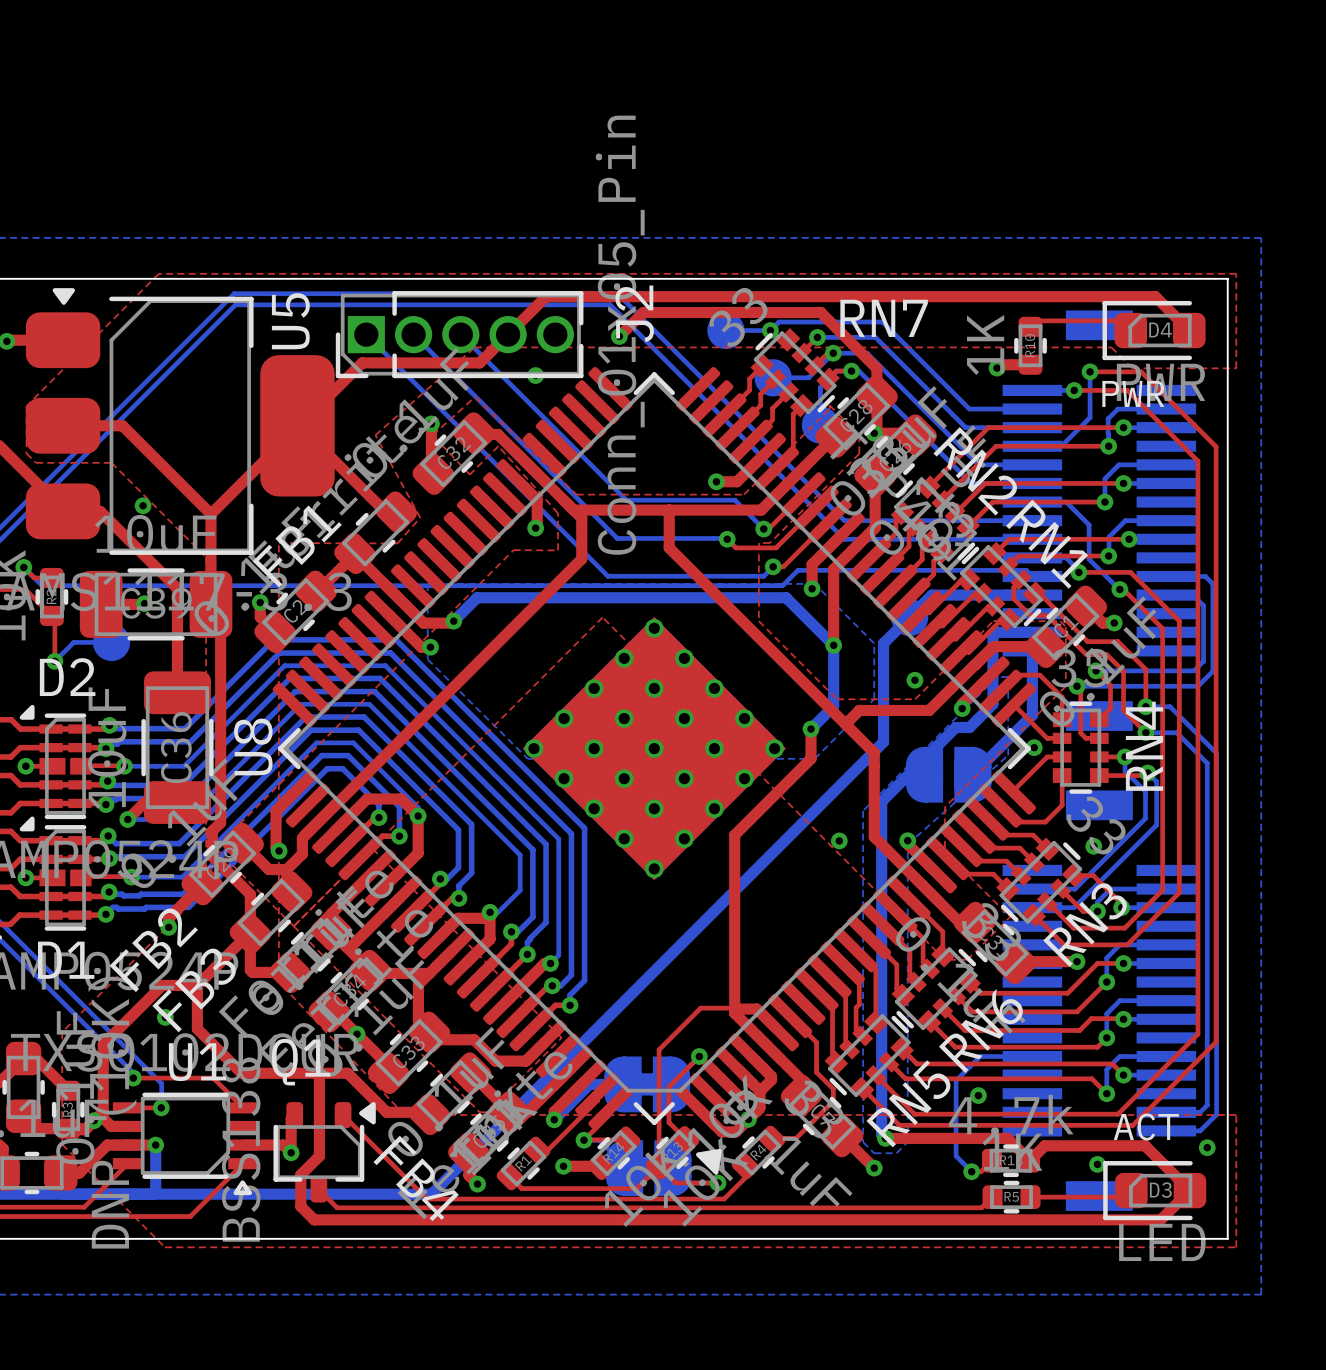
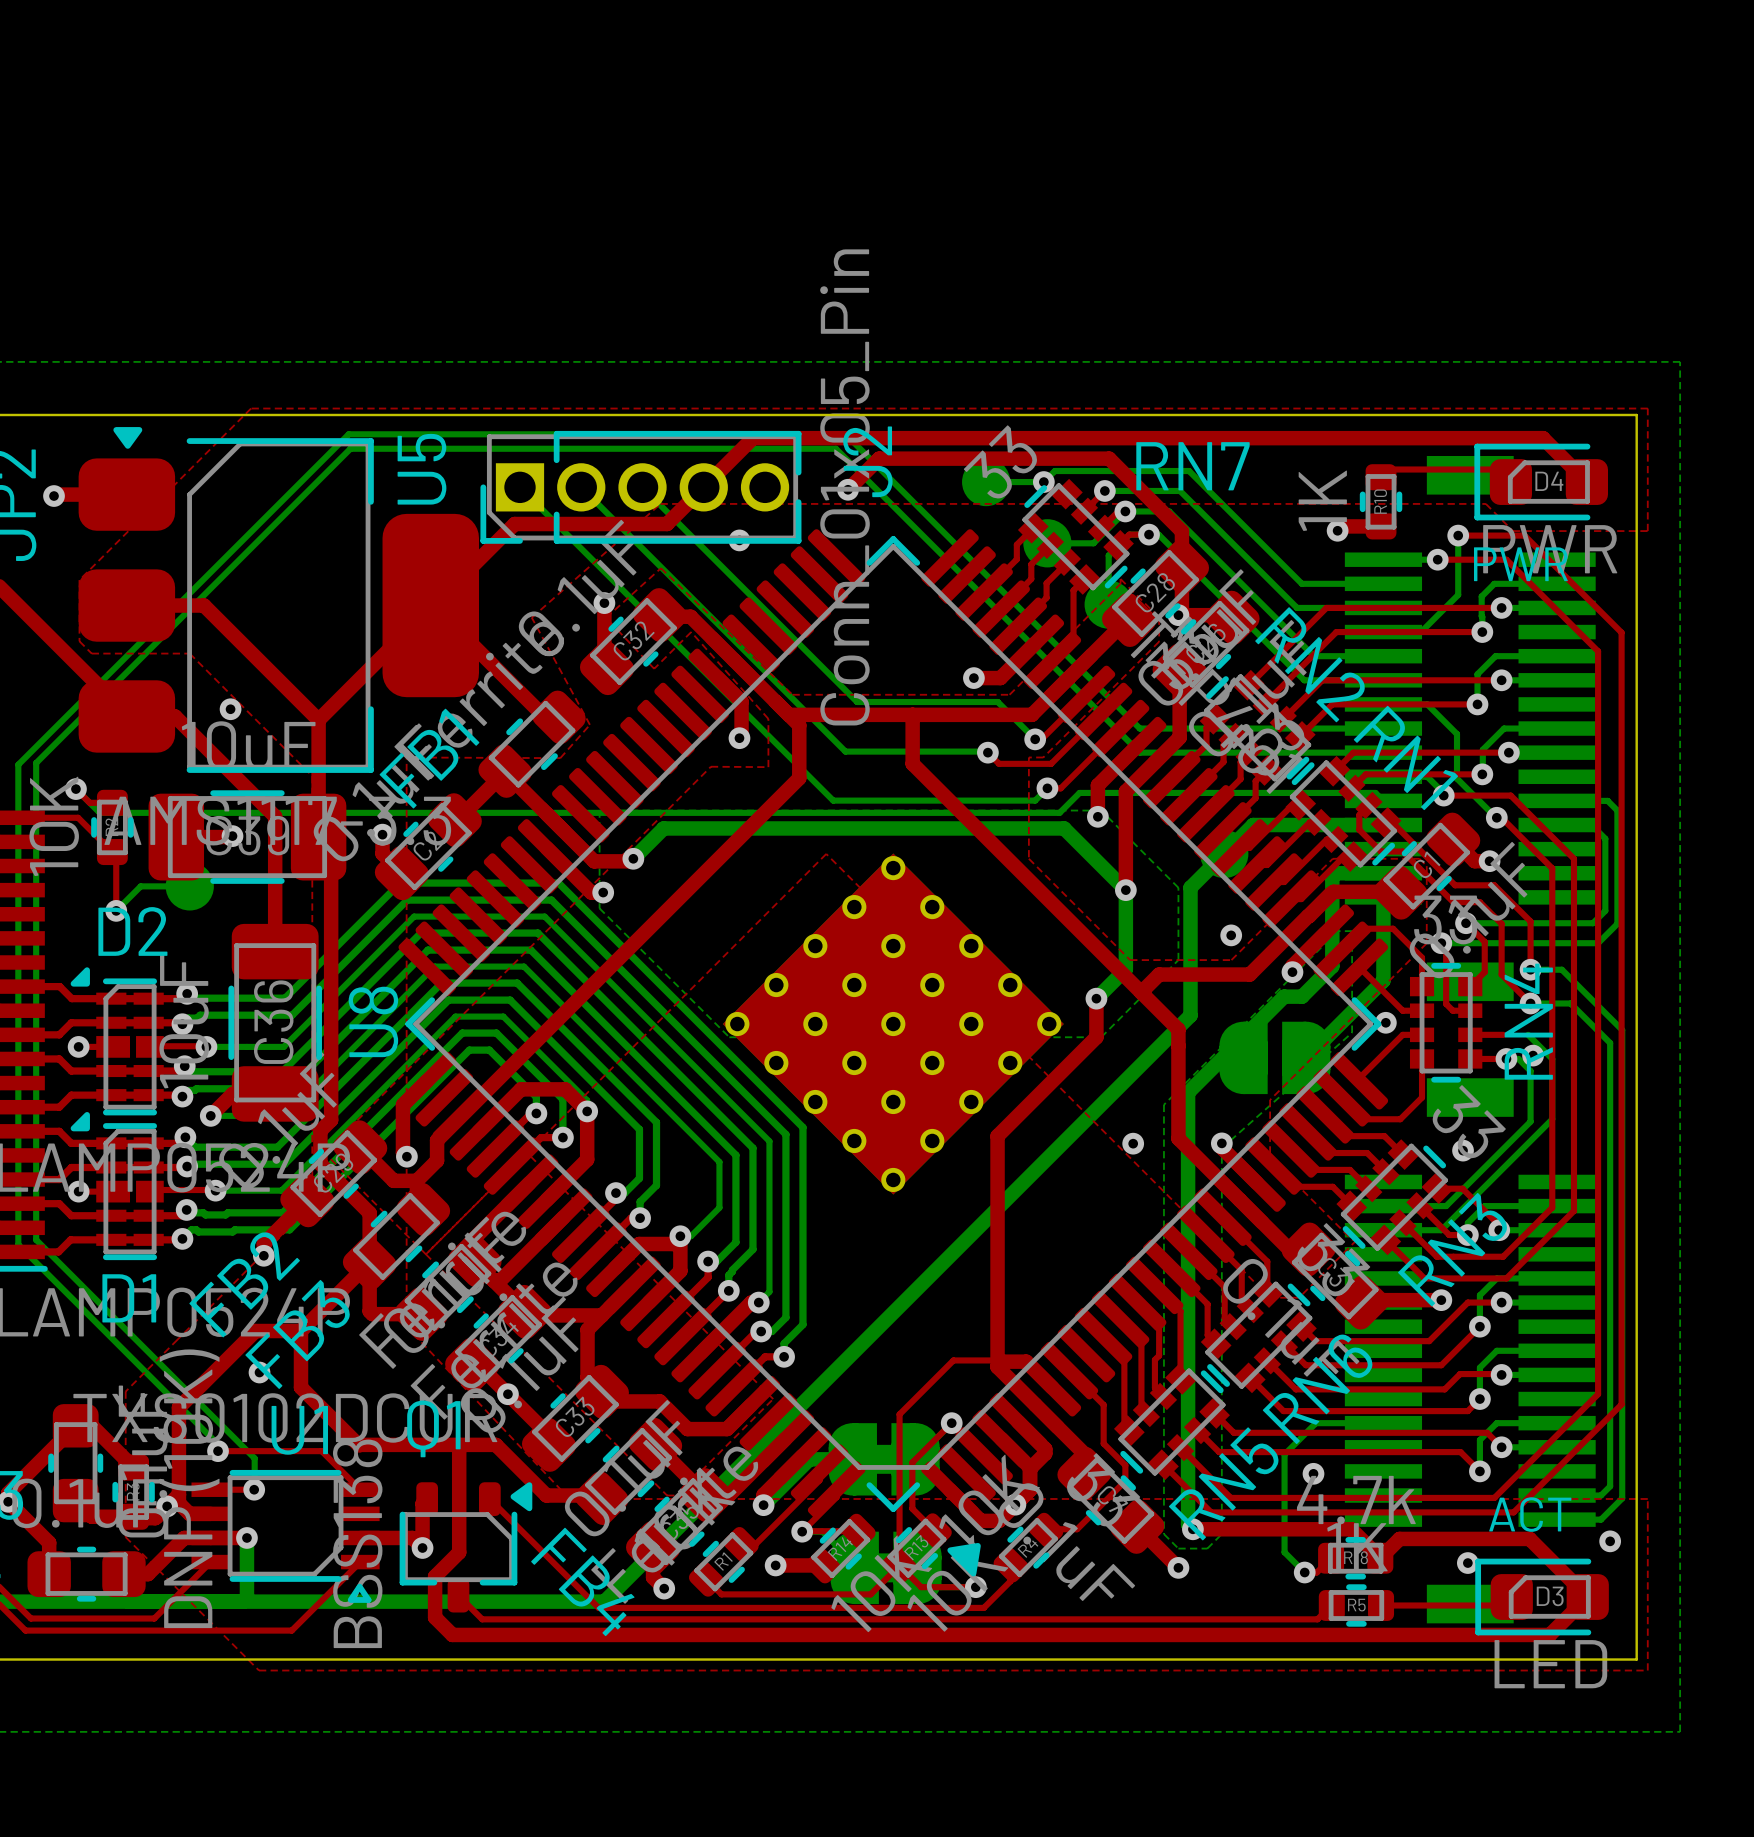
bottom track: (1125, 756) (1125, 771) (1145, 791) (1145, 818) (1074, 889) -> (1506, 1058) (1518, 1058) (1530, 1071) (1530, 1121) (1446, 1206) (1438, 1206)
via position: (1125, 756) -> (1506, 1058)
top track: (1147, 772) (1145, 775) (1127, 775) -> none
bottom track: (1147, 772) (1156, 781) (1156, 825) (1074, 907) -> (1528, 1034) (1552, 1058) (1552, 1119) (1441, 1230) (1437, 1230)

